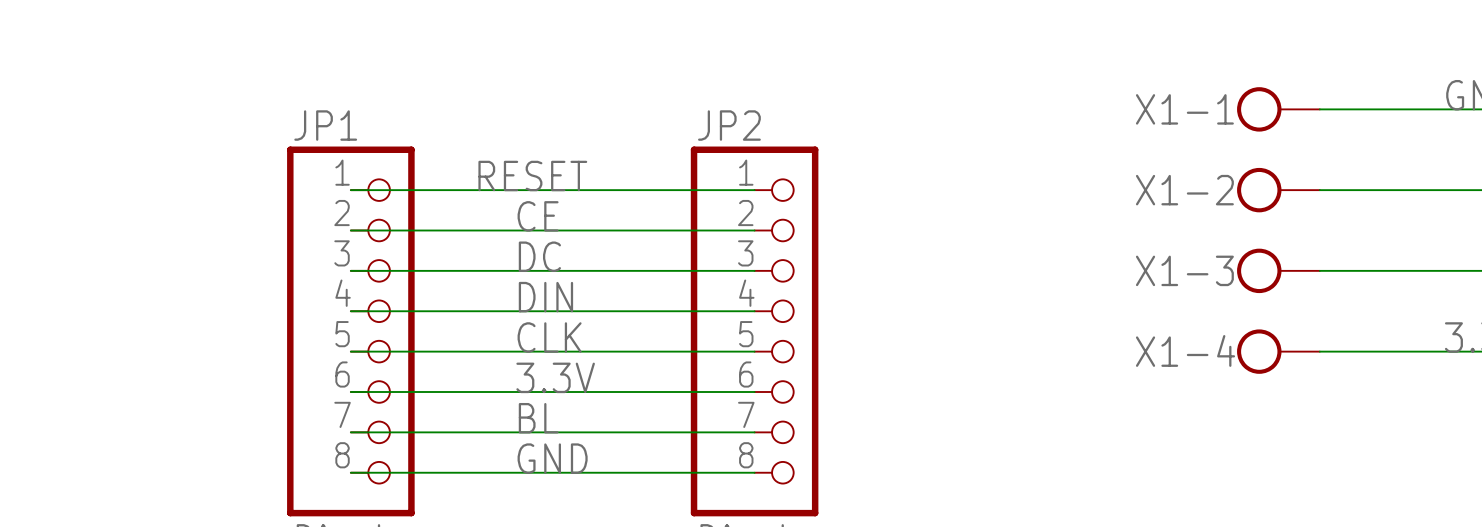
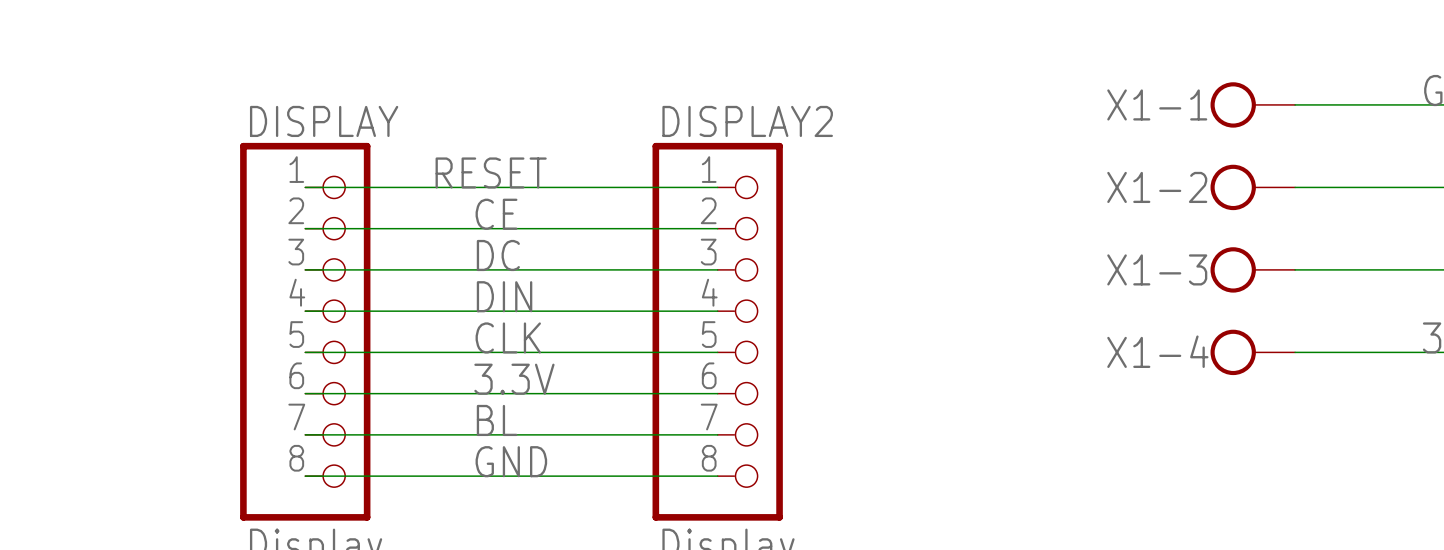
JP1 name: JP1 (325, 125) -> DISPLAY (324, 121)
JP2 name: JP2 (729, 125) -> DISPLAY2 (747, 121)

